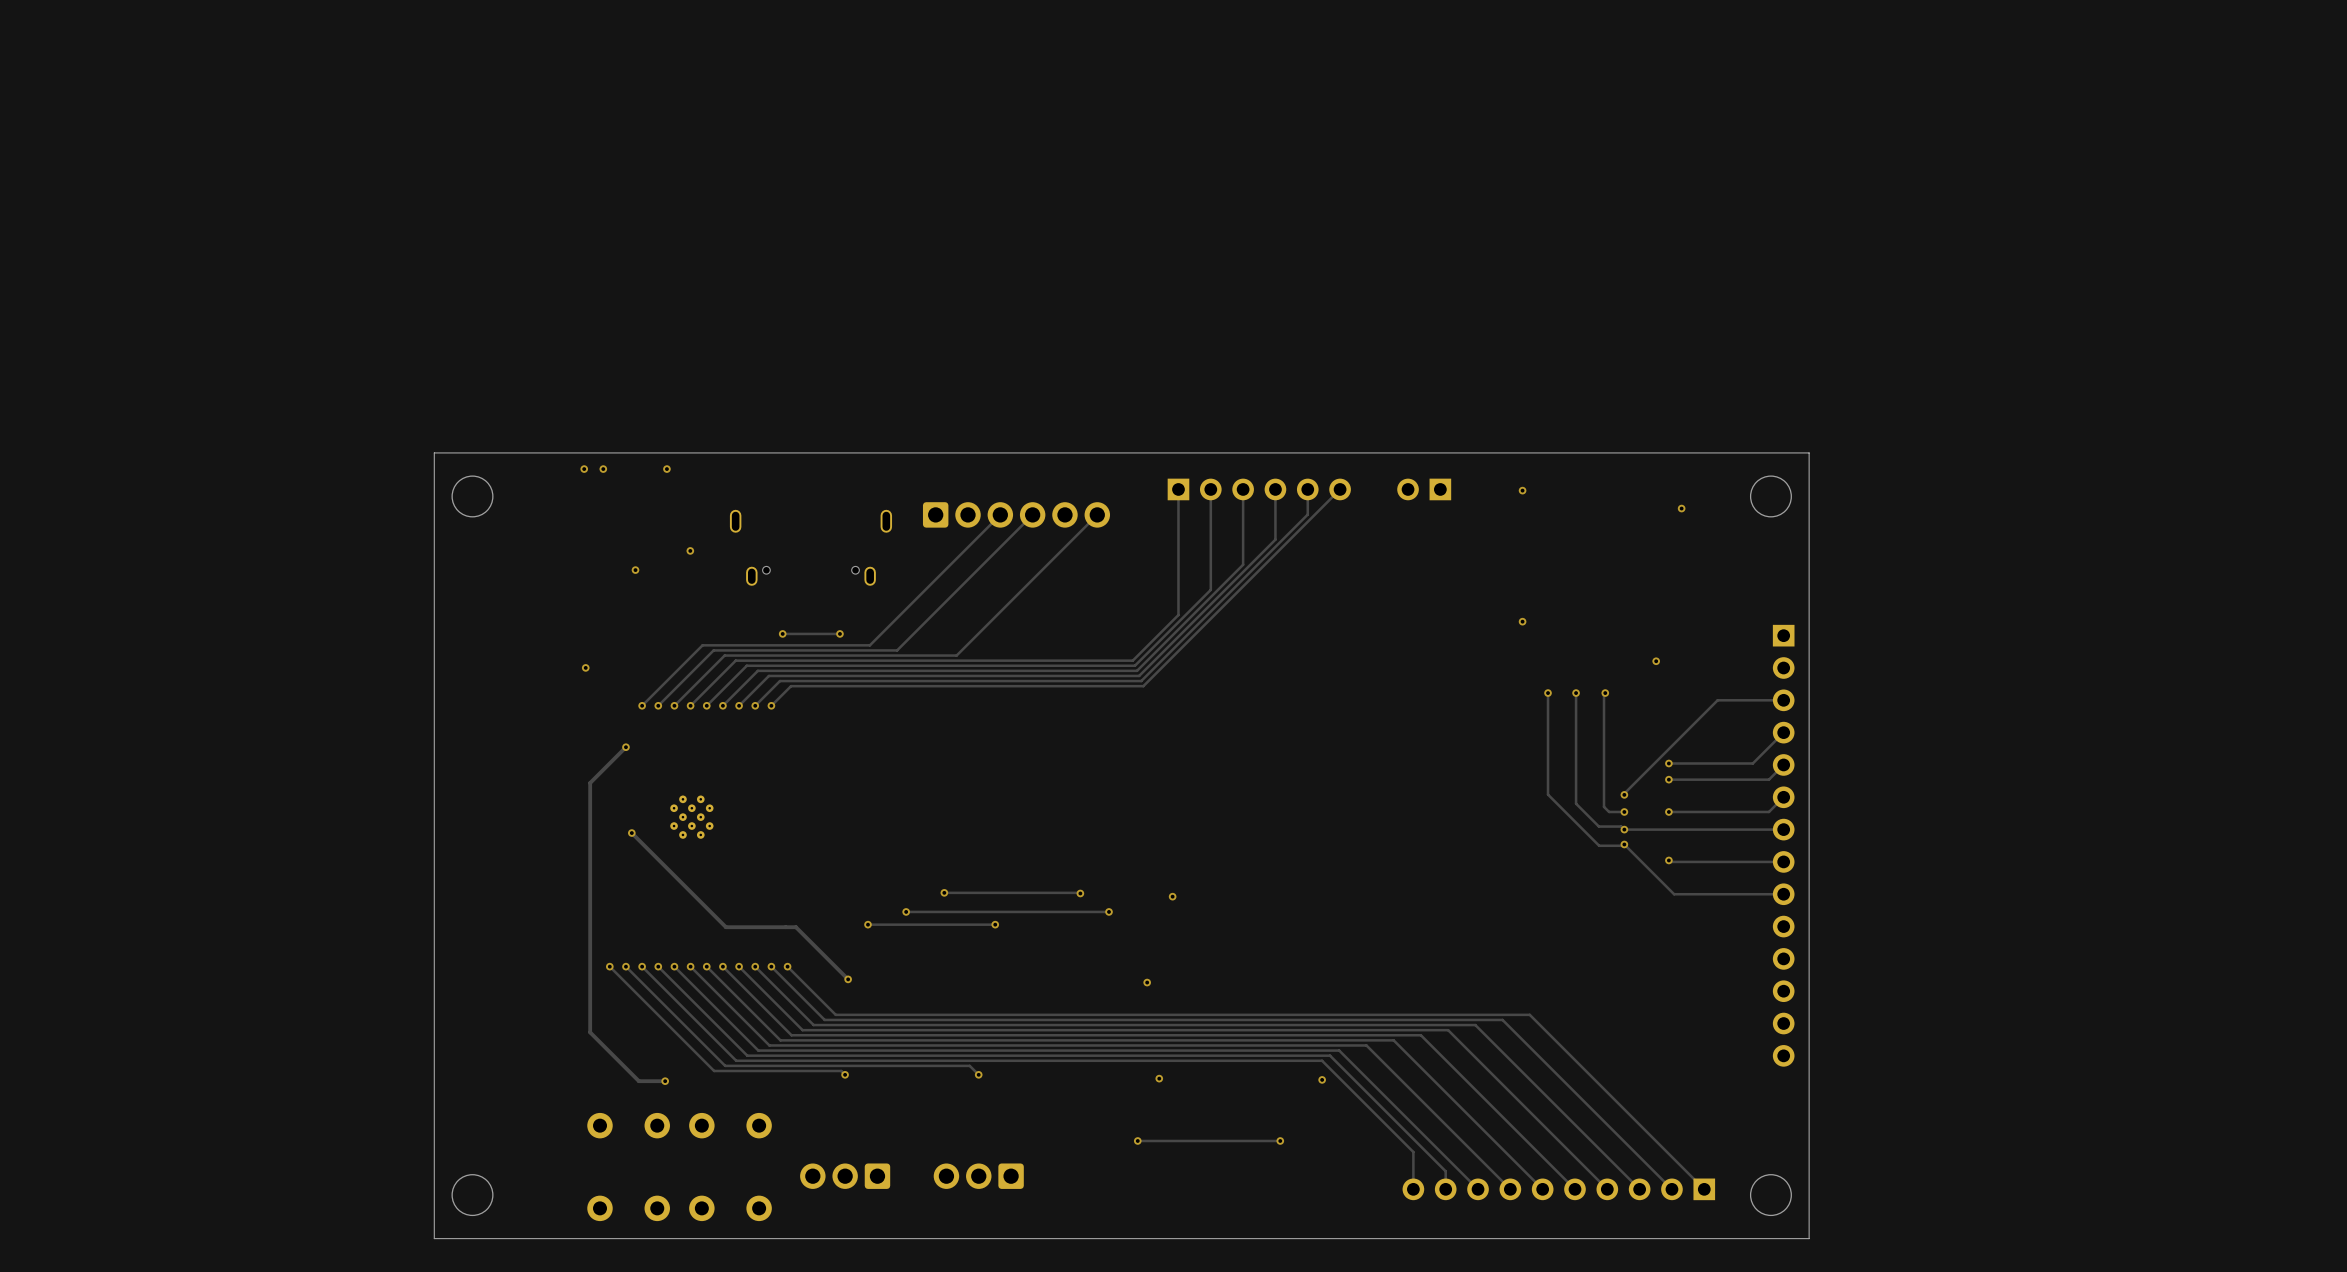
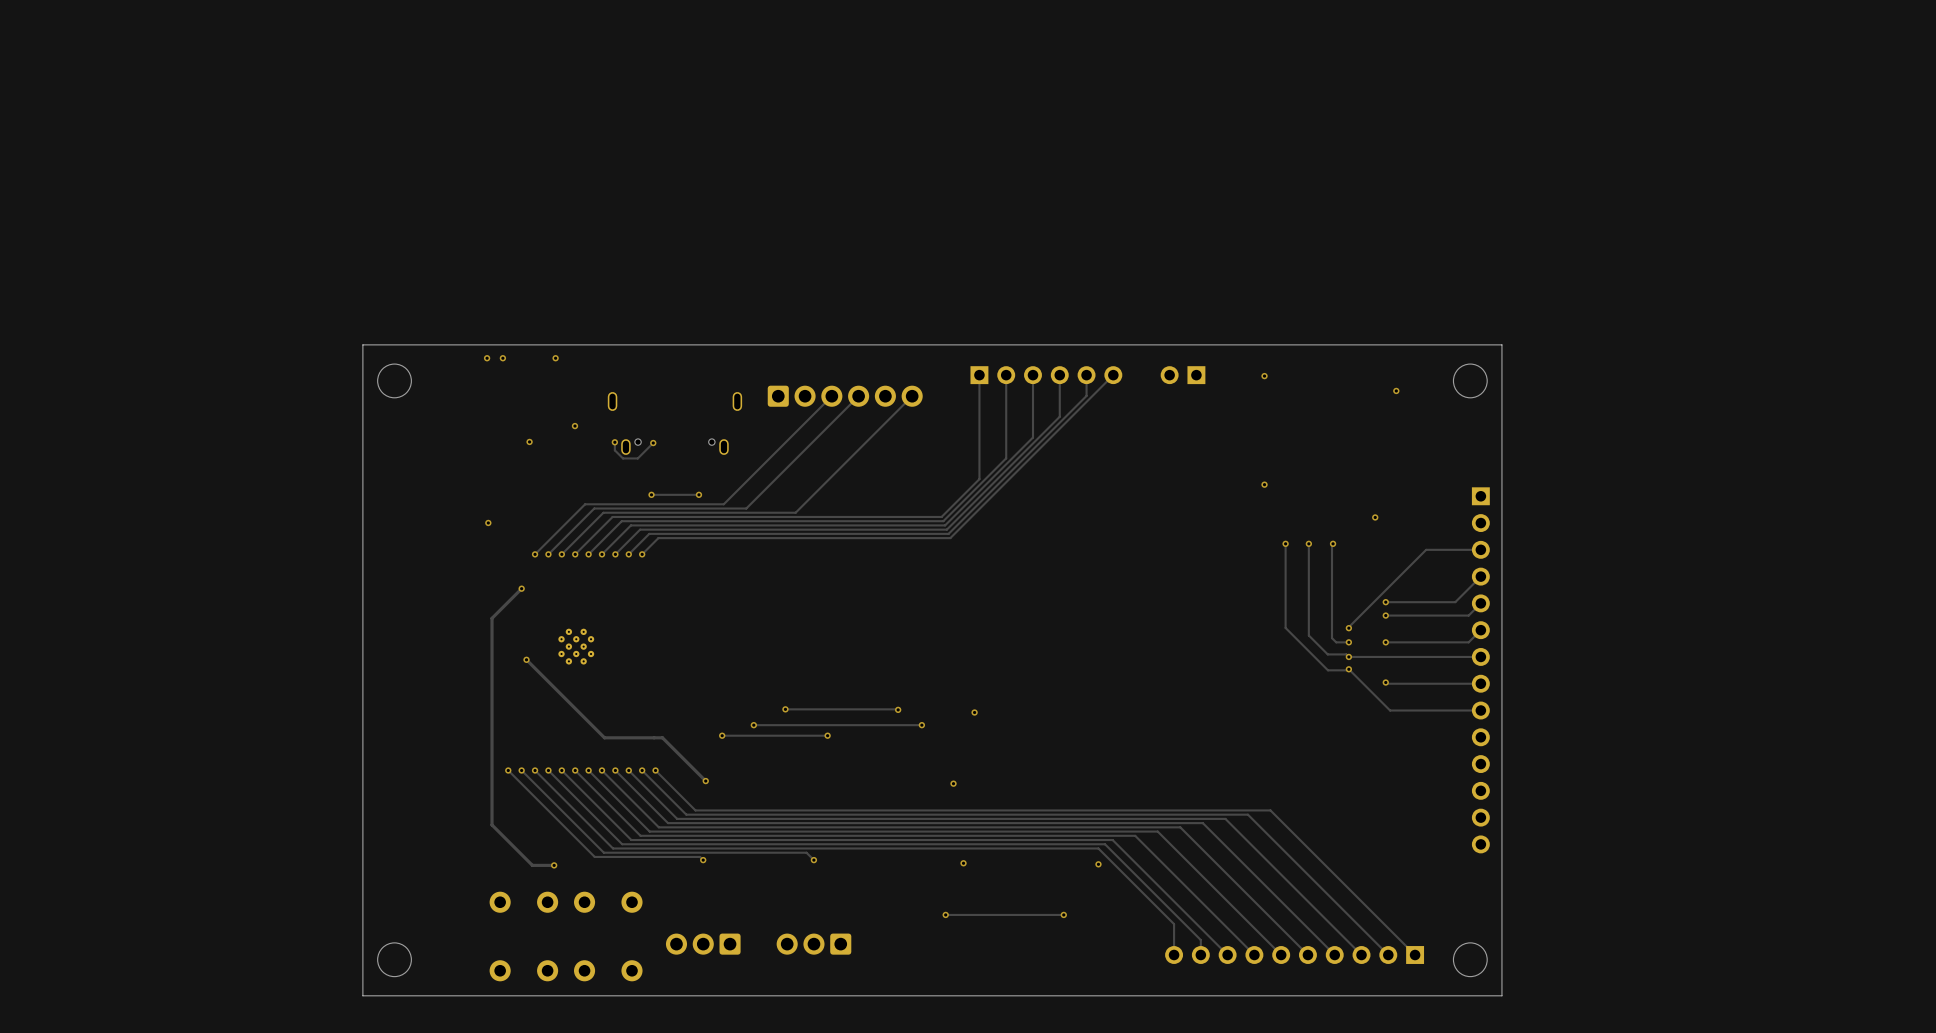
track: none -> (614, 442) (614, 450) (622, 458) (637, 458) (653, 443)
via: none -> (614, 442)
via: none -> (653, 443)

